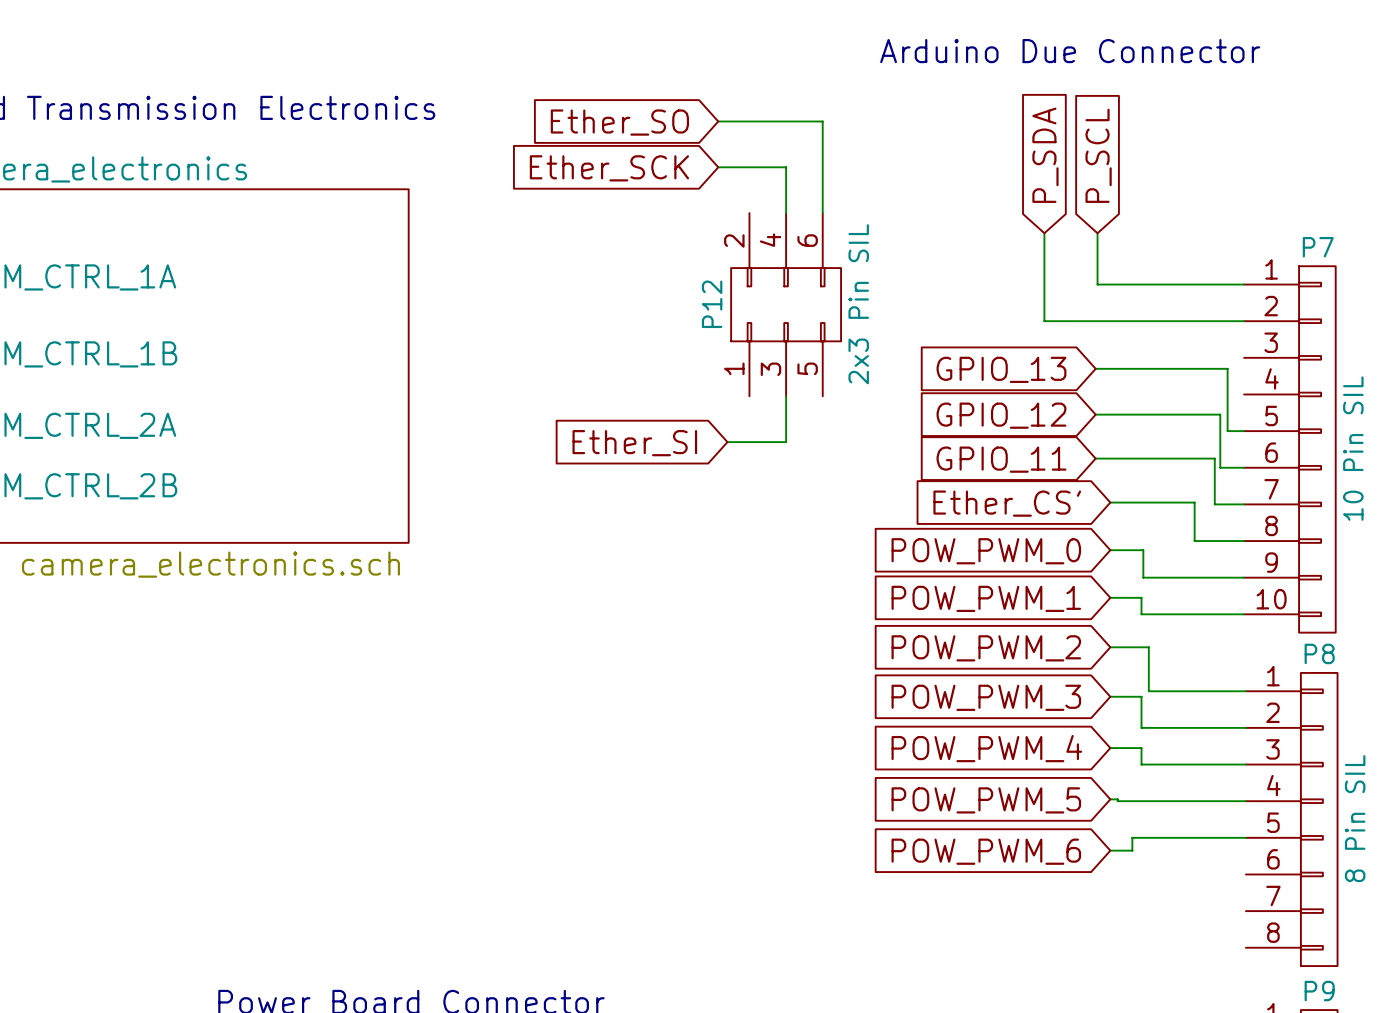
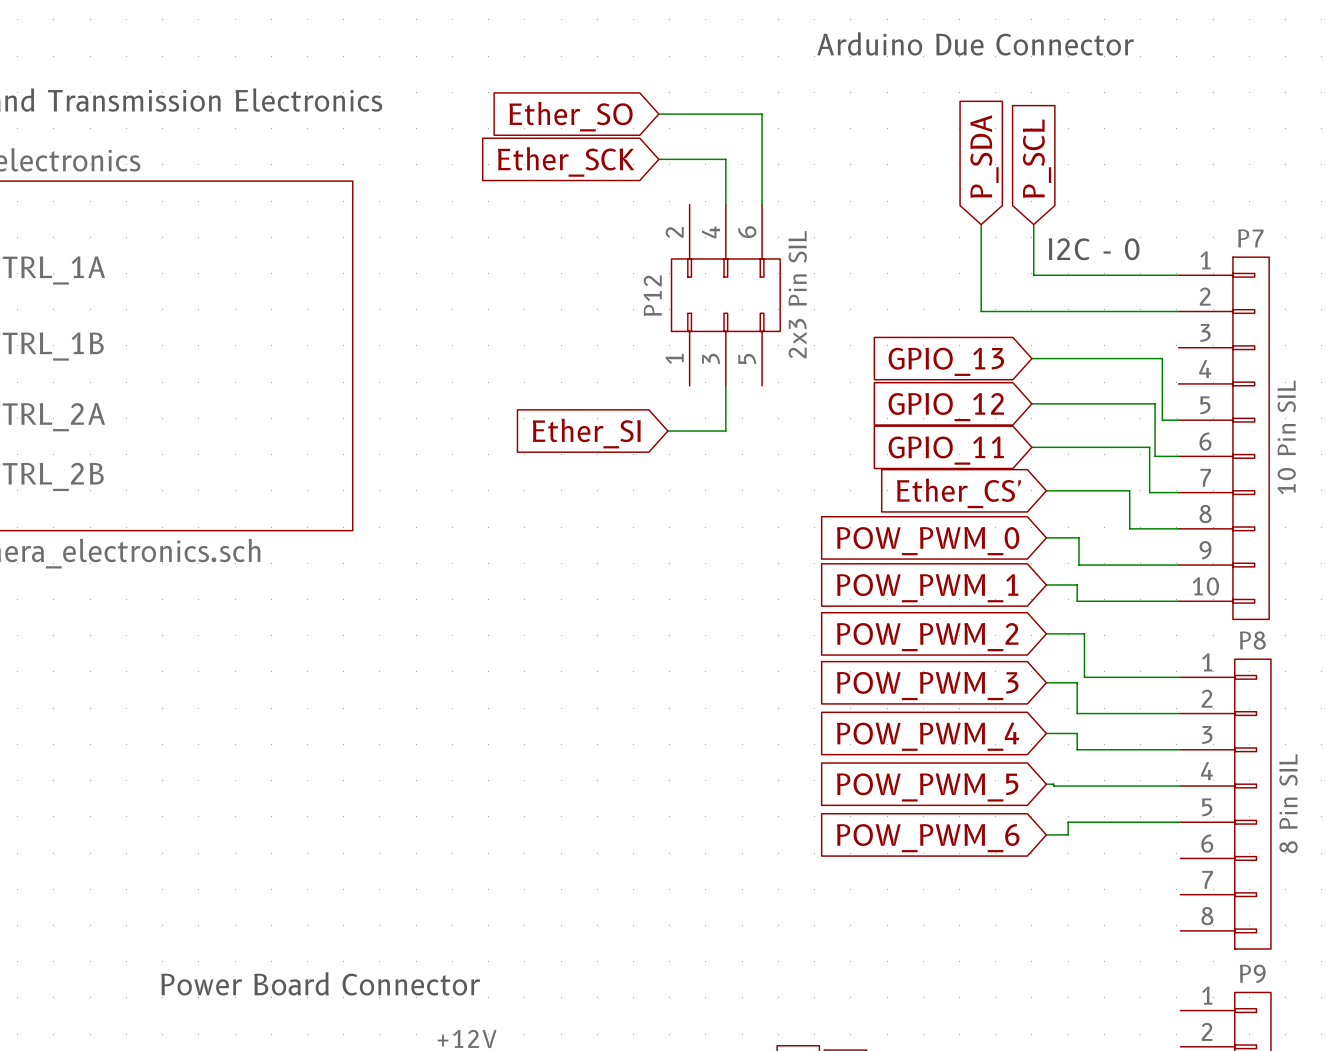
text: none -> I2C - 0 (1094, 249)

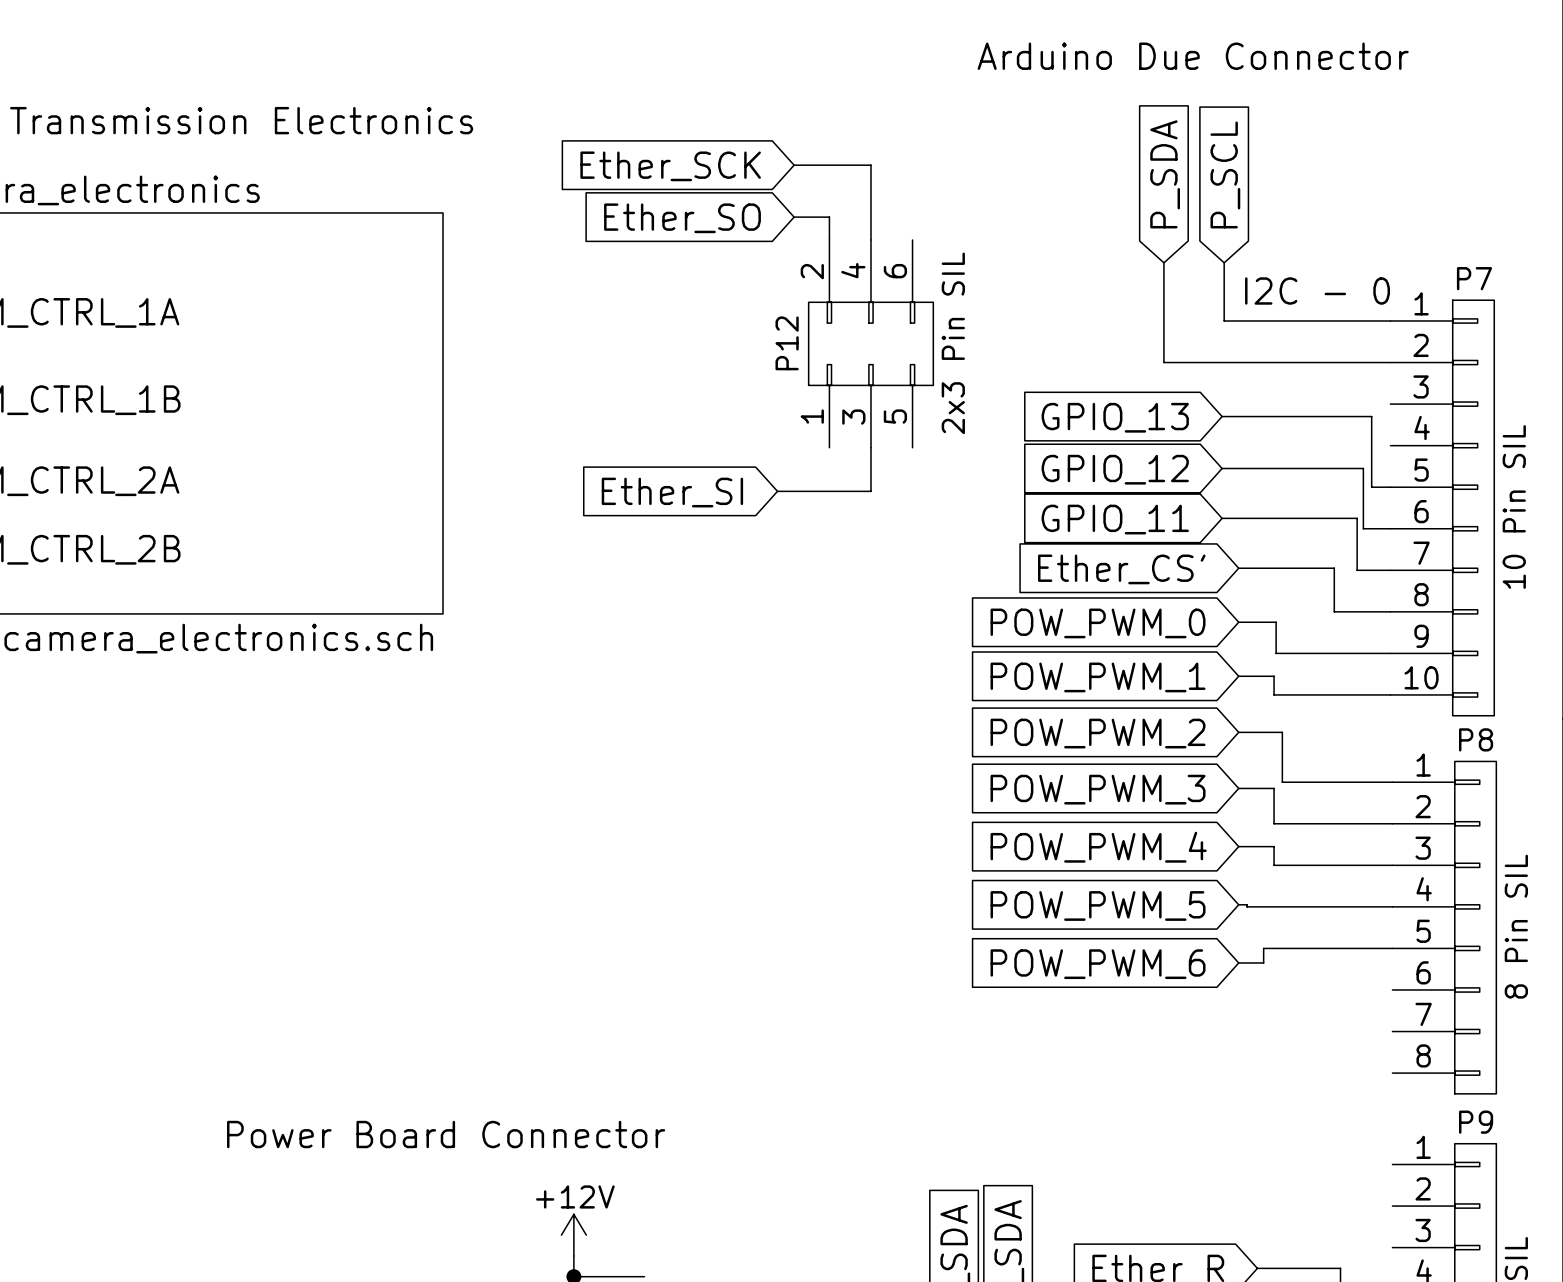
wire: (658, 114) (762, 114) (762, 204) -> none
global label position: Ether_SO (571, 116) -> Ether_SO (682, 218)
wire: (658, 159) (725, 159) -> (794, 165) (870, 165) (870, 188)
global label position: Ether_SCK (566, 161) -> Ether_SCK (670, 166)
wire: none -> (794, 217) (829, 217) (829, 239)
wire: (725, 423) (725, 431) (667, 431) -> (870, 491) (777, 491)
global label position: Ether_SI (586, 433) -> Ether_SI (672, 492)

